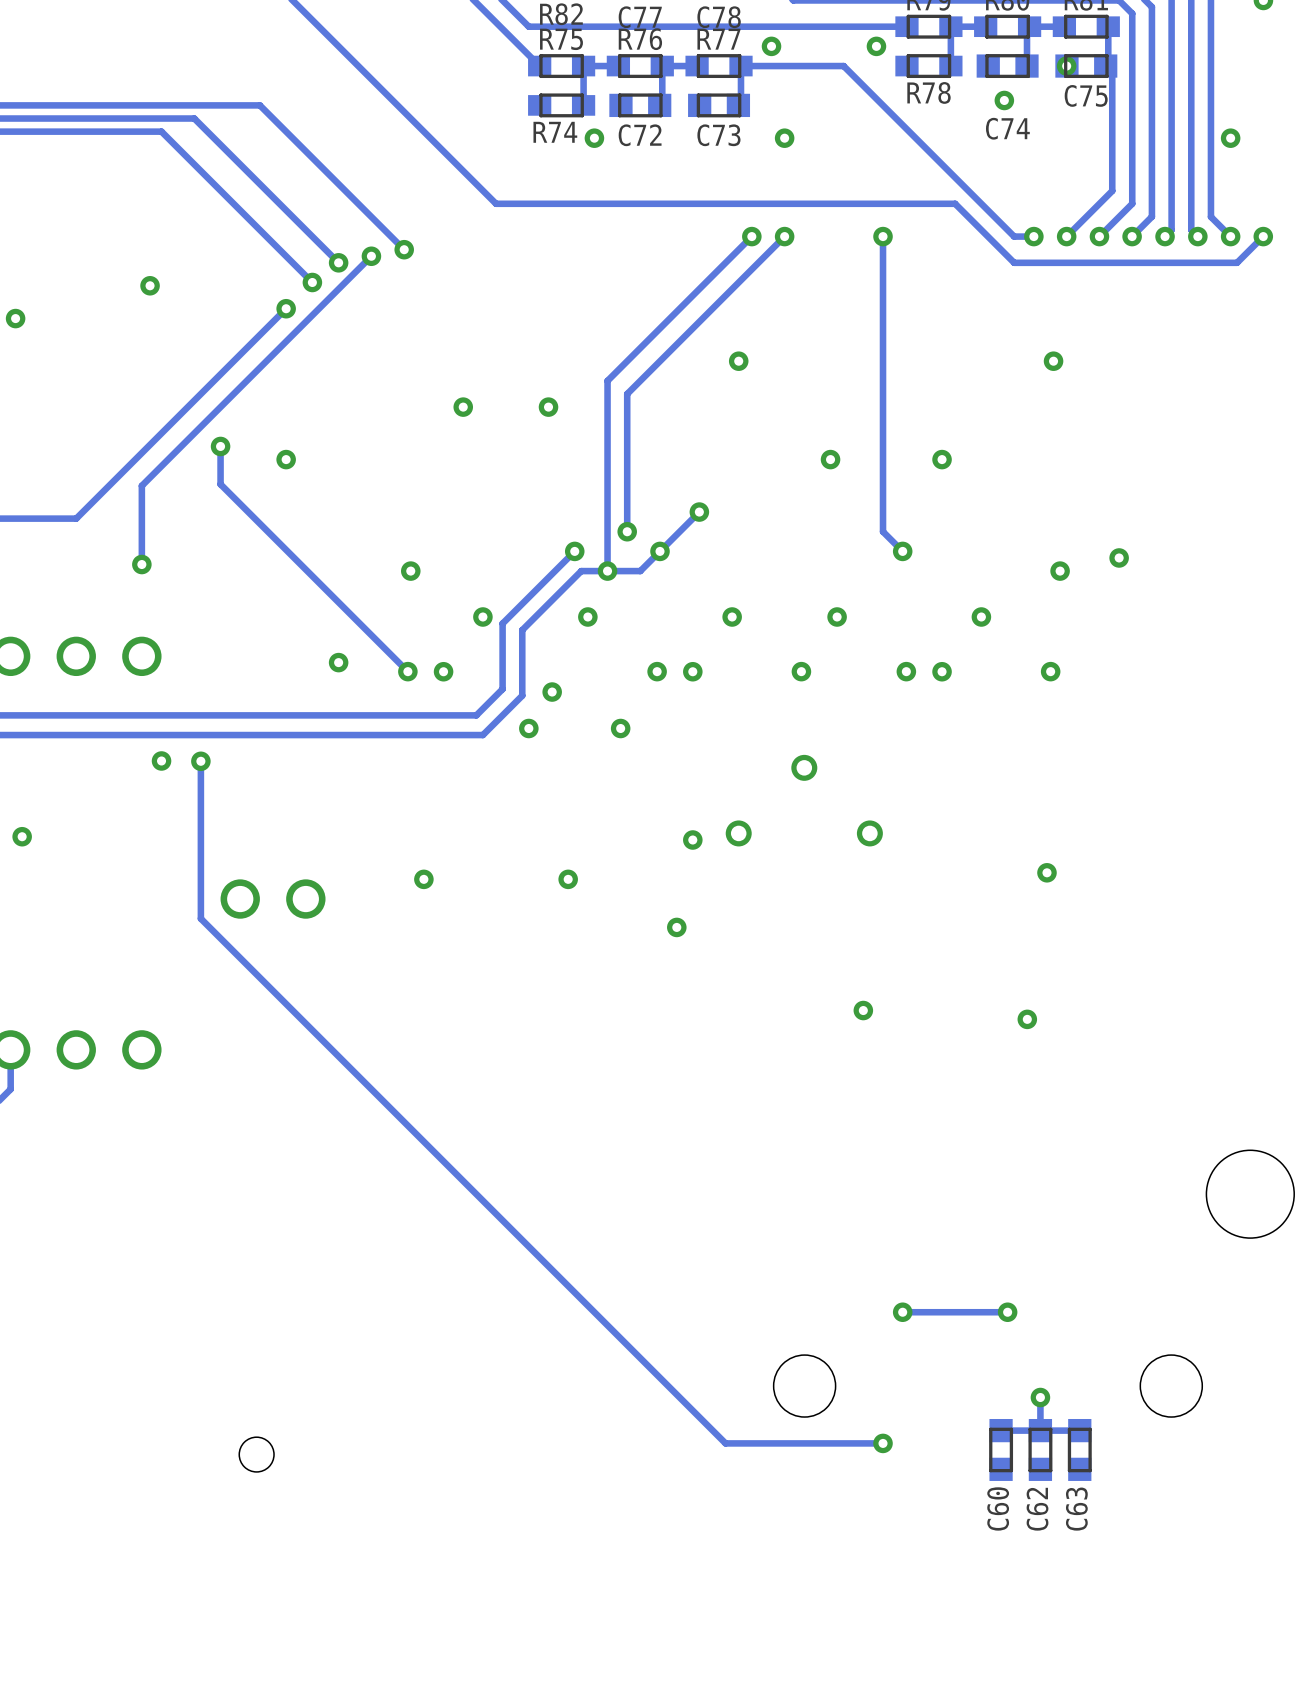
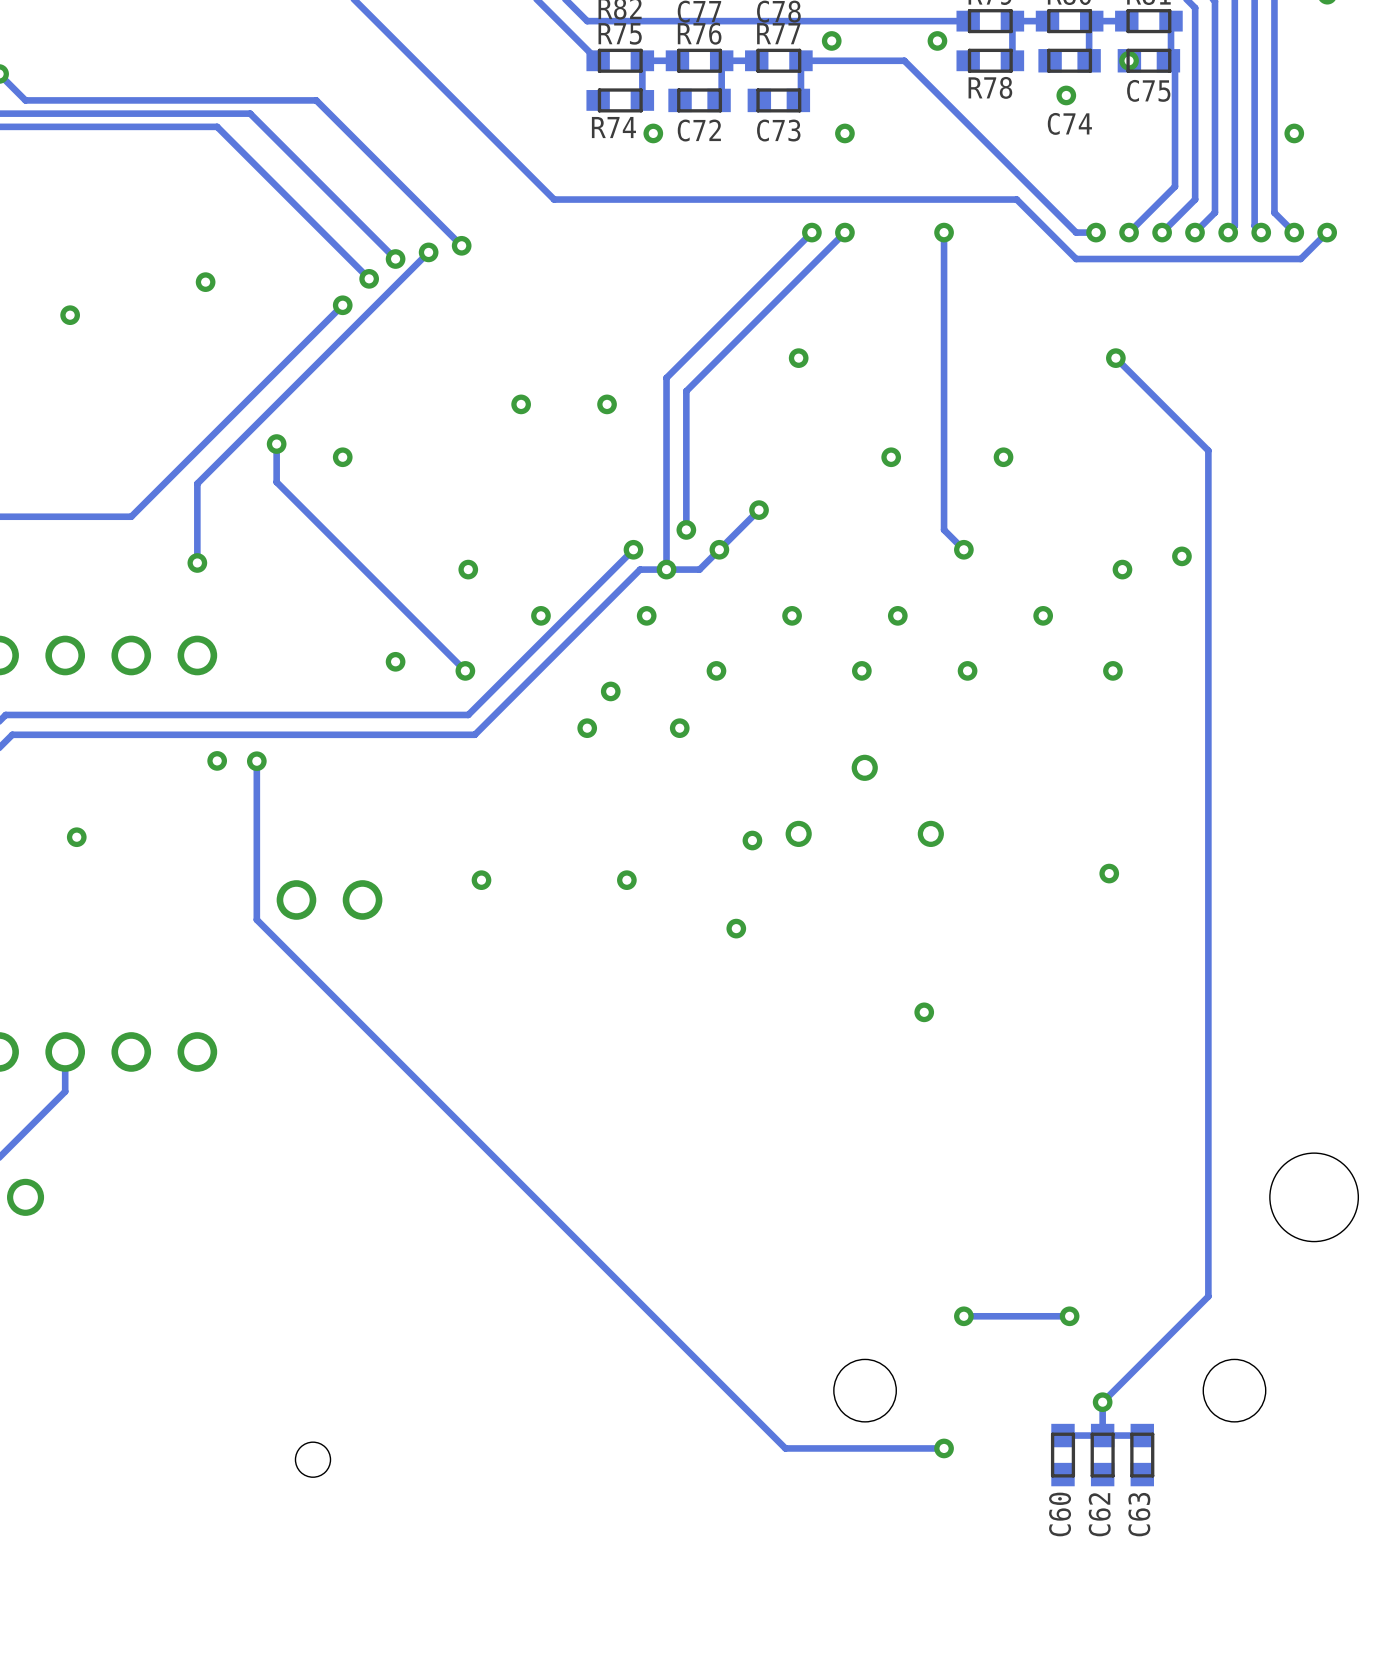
track: none -> (1115, 358) (1208, 450) (1208, 1296) (1102, 1402)
track: (502, 623) (502, 689) (476, 715) (410, 715) -> (560, 622) (468, 714)
track: (522, 630) (522, 695) (482, 735) (417, 735) -> (580, 629) (474, 734)
via: (443, 671) -> none
via: (692, 671) -> none
via: (942, 671) -> none
via: (1027, 1019) -> none

